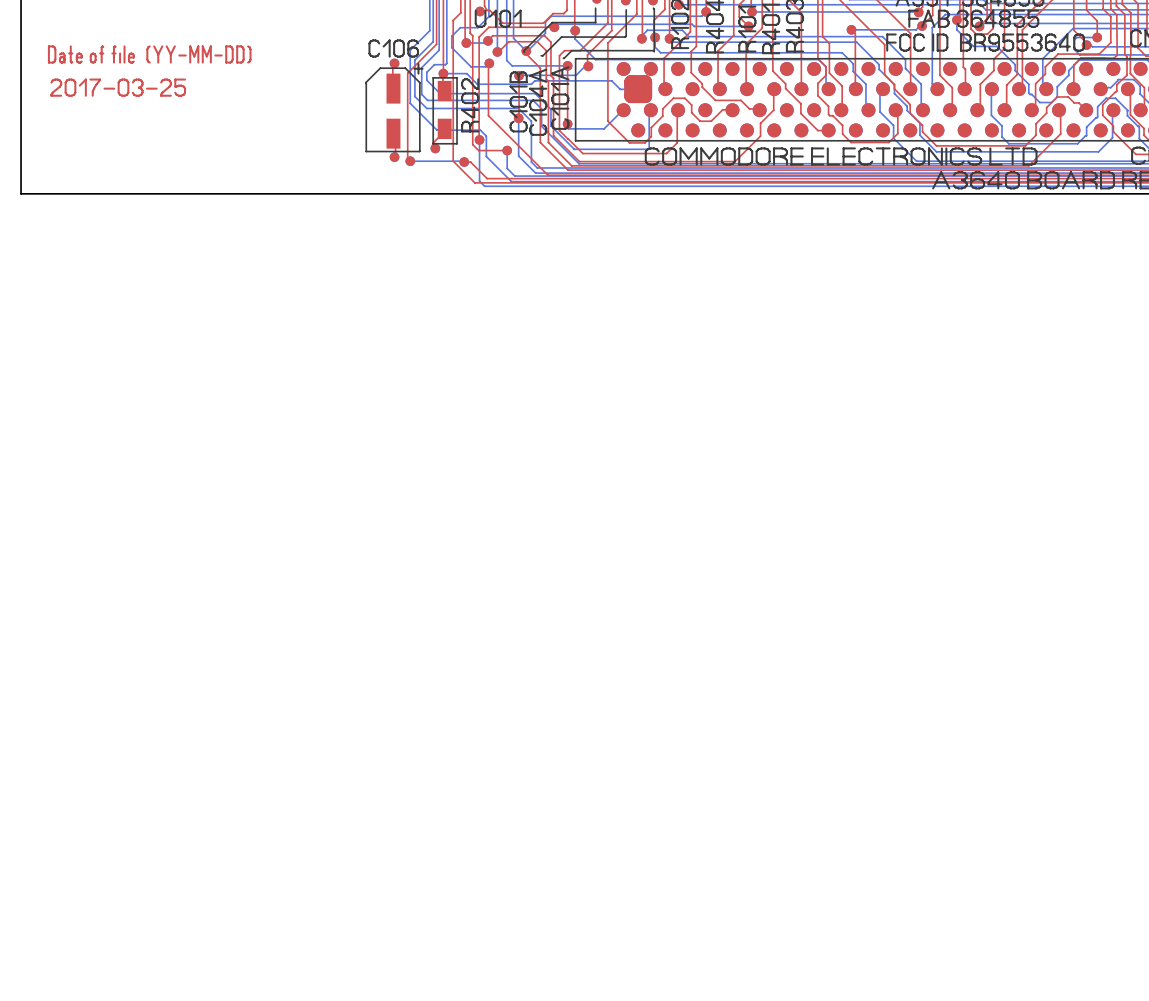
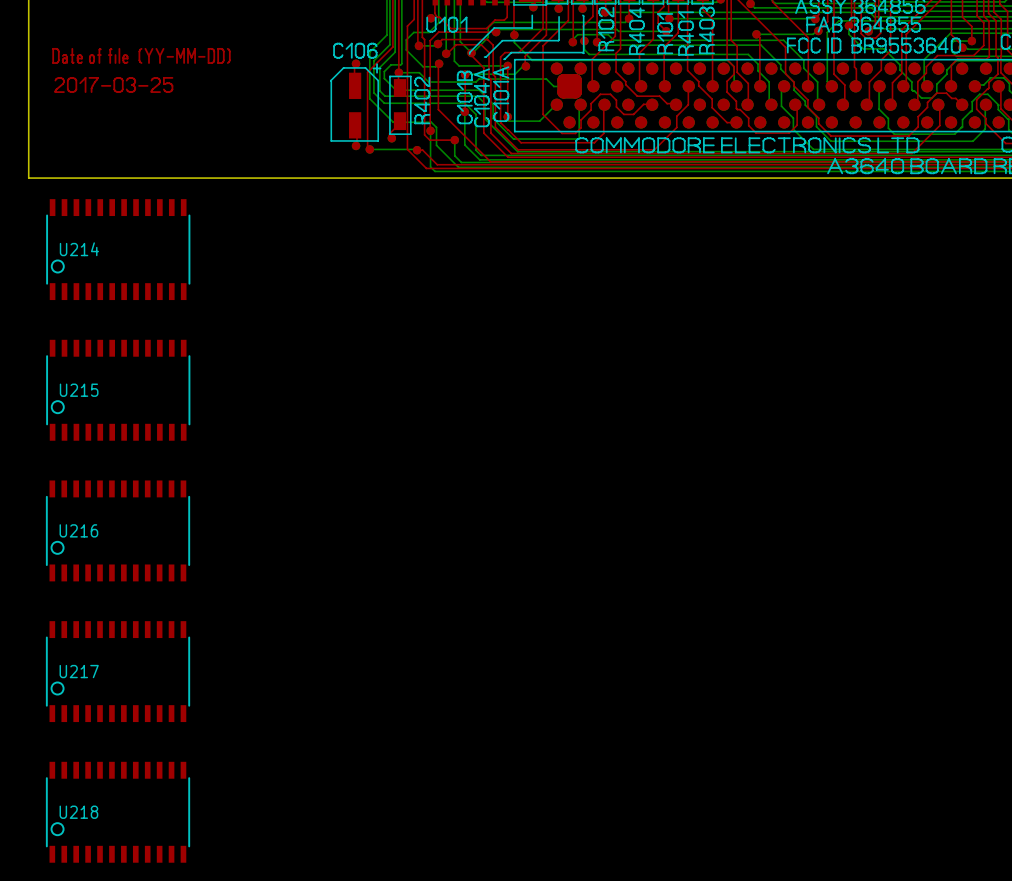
U214: none -> (118, 249)
U215: none -> (118, 390)
U216: none -> (118, 530)
U217: none -> (118, 671)
U218: none -> (118, 812)

